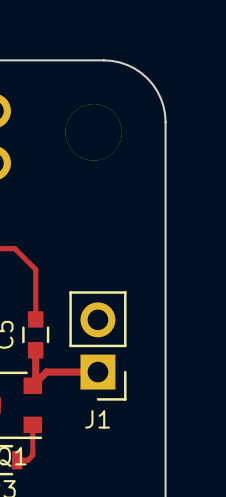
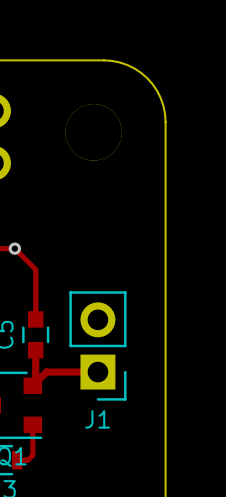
via: none -> (14, 248)

